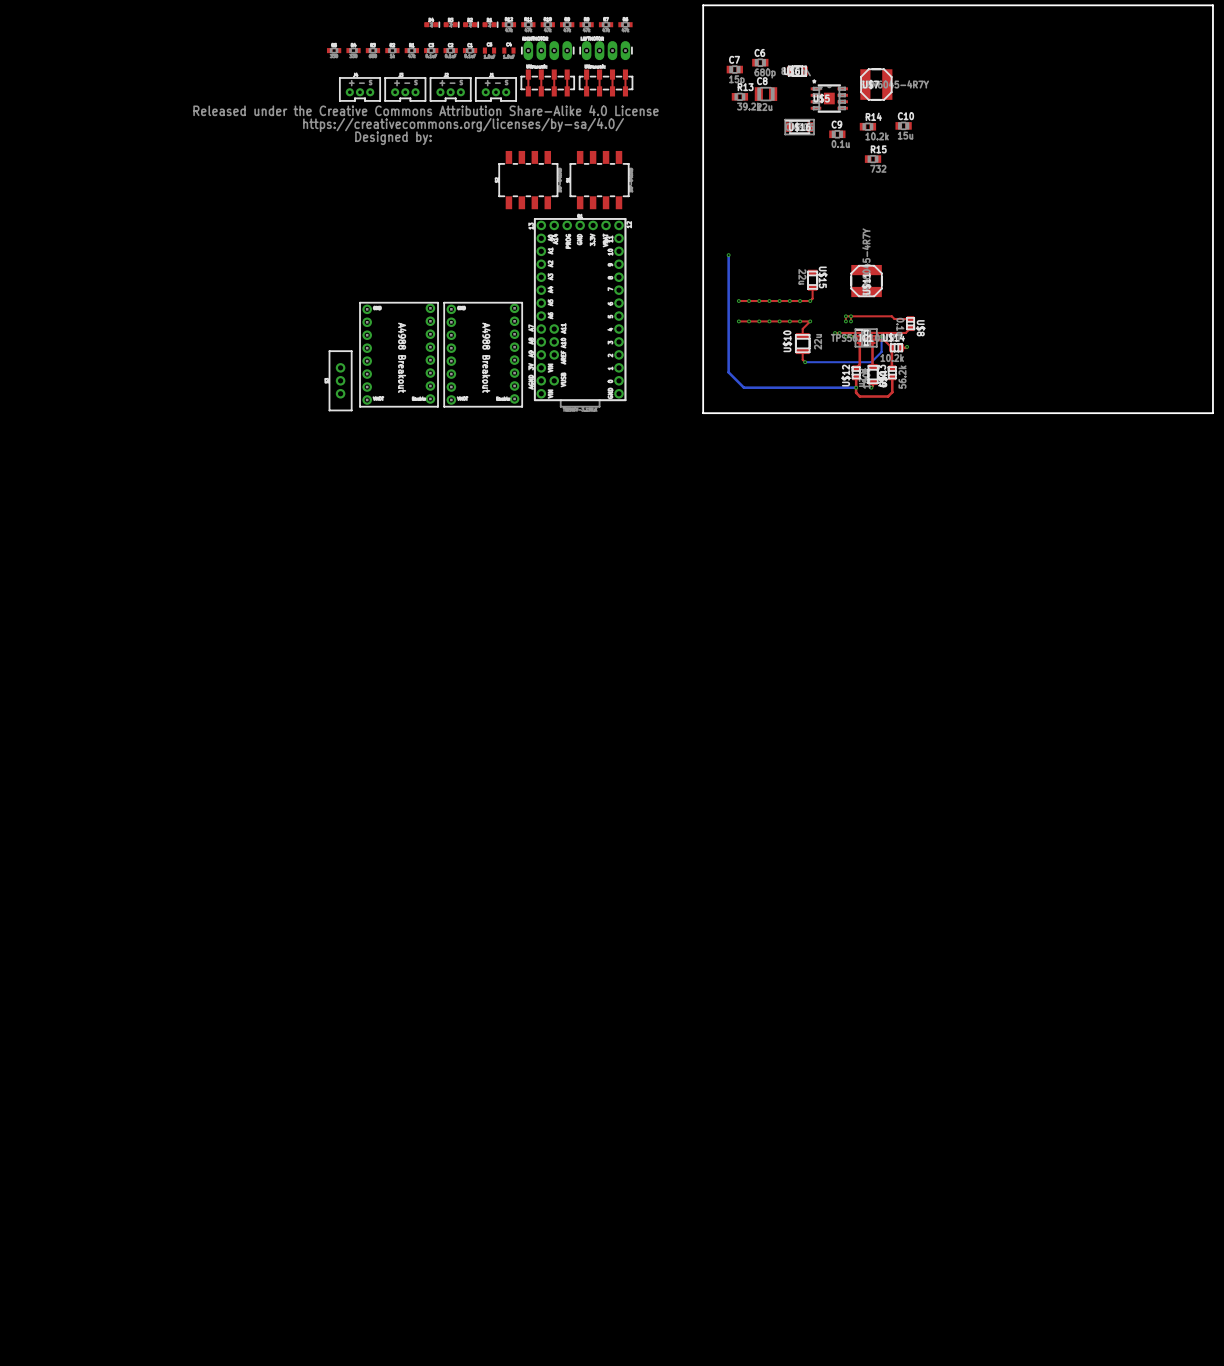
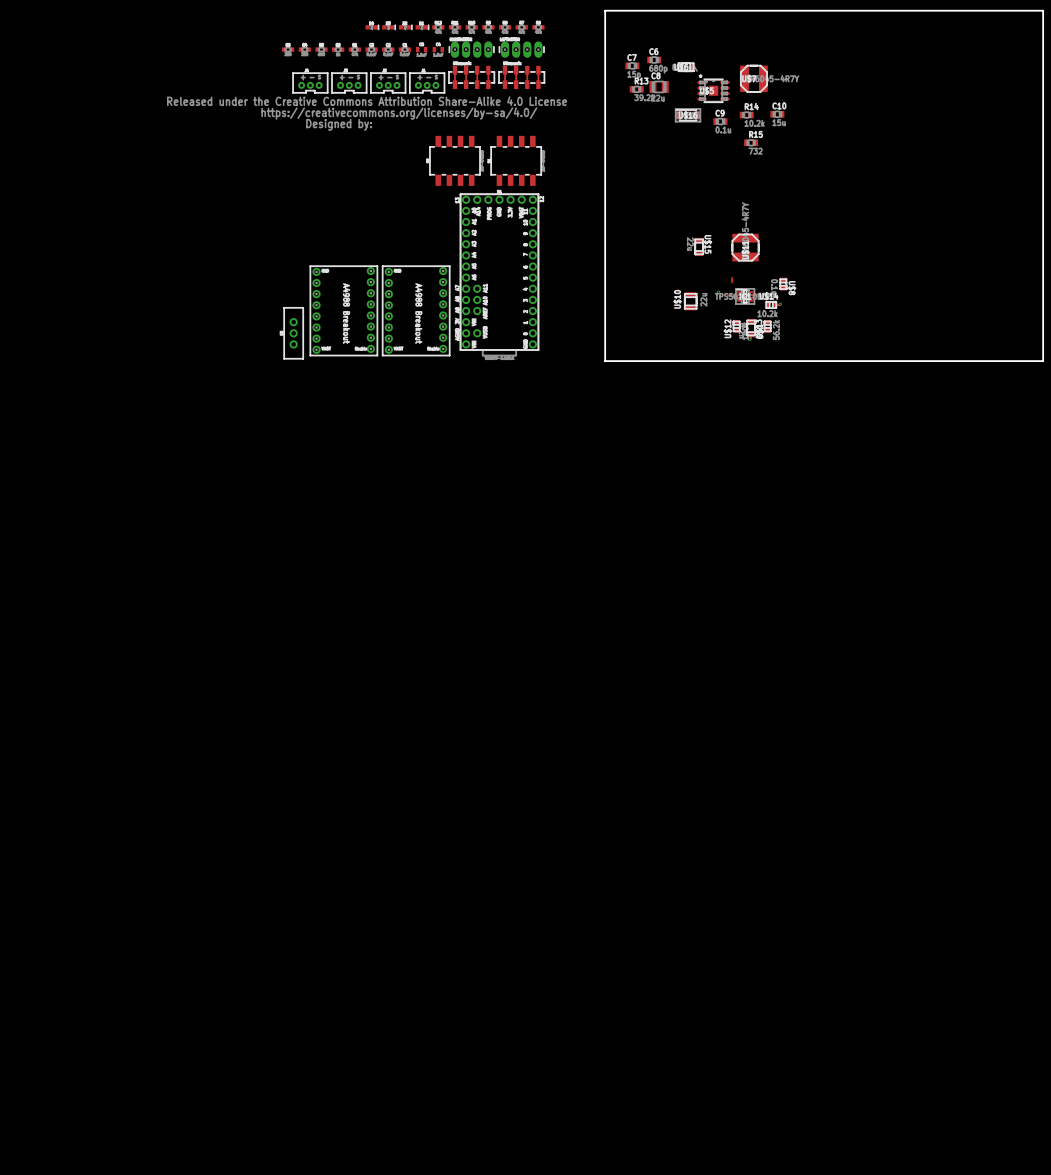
bottom track: (728, 255) (728, 372) (743, 387) (856, 387) -> none
via: (728, 255) -> none
top track: (812, 287) (812, 298) (810, 301) (738, 301) -> none
via: (738, 301) -> none
via: (749, 301) -> none
via: (759, 301) -> none
via: (769, 301) -> none
via: (779, 301) -> none
via: (789, 301) -> none
via: (800, 301) -> none
via: (810, 301) -> none
via: (845, 316) -> none
via: (851, 316) -> none
top track: (910, 319) (894, 319) (891, 316) (845, 316) (845, 321) -> none
top track: (738, 321) (810, 321) (802, 328) (802, 335) -> none
via: (738, 321) -> none
via: (749, 321) -> none
via: (759, 321) -> none
via: (769, 321) -> none
via: (779, 321) -> none
via: (789, 321) -> none
via: (800, 321) -> none
via: (810, 321) -> none
via: (845, 321) -> none
via: (851, 321) -> none
top track: (910, 328) (905, 332) (872, 332) -> none
top track: (859, 332) (835, 333) -> none
via: (839, 333) -> none
via: (845, 336) -> none
bottom track: (881, 336) (881, 352) (871, 362) (805, 362) -> none
top track: (872, 339) (884, 340) (891, 347) (892, 368) -> none
top track: (859, 342) (859, 364) (856, 368) -> none
top track: (872, 342) (873, 366) -> none
top track: (802, 351) (802, 359) (805, 362) -> none
via: (805, 362) -> none
top track: (892, 377) (892, 392) (888, 396) (859, 396) (856, 392) (856, 377) -> none
via: (856, 387) -> none

